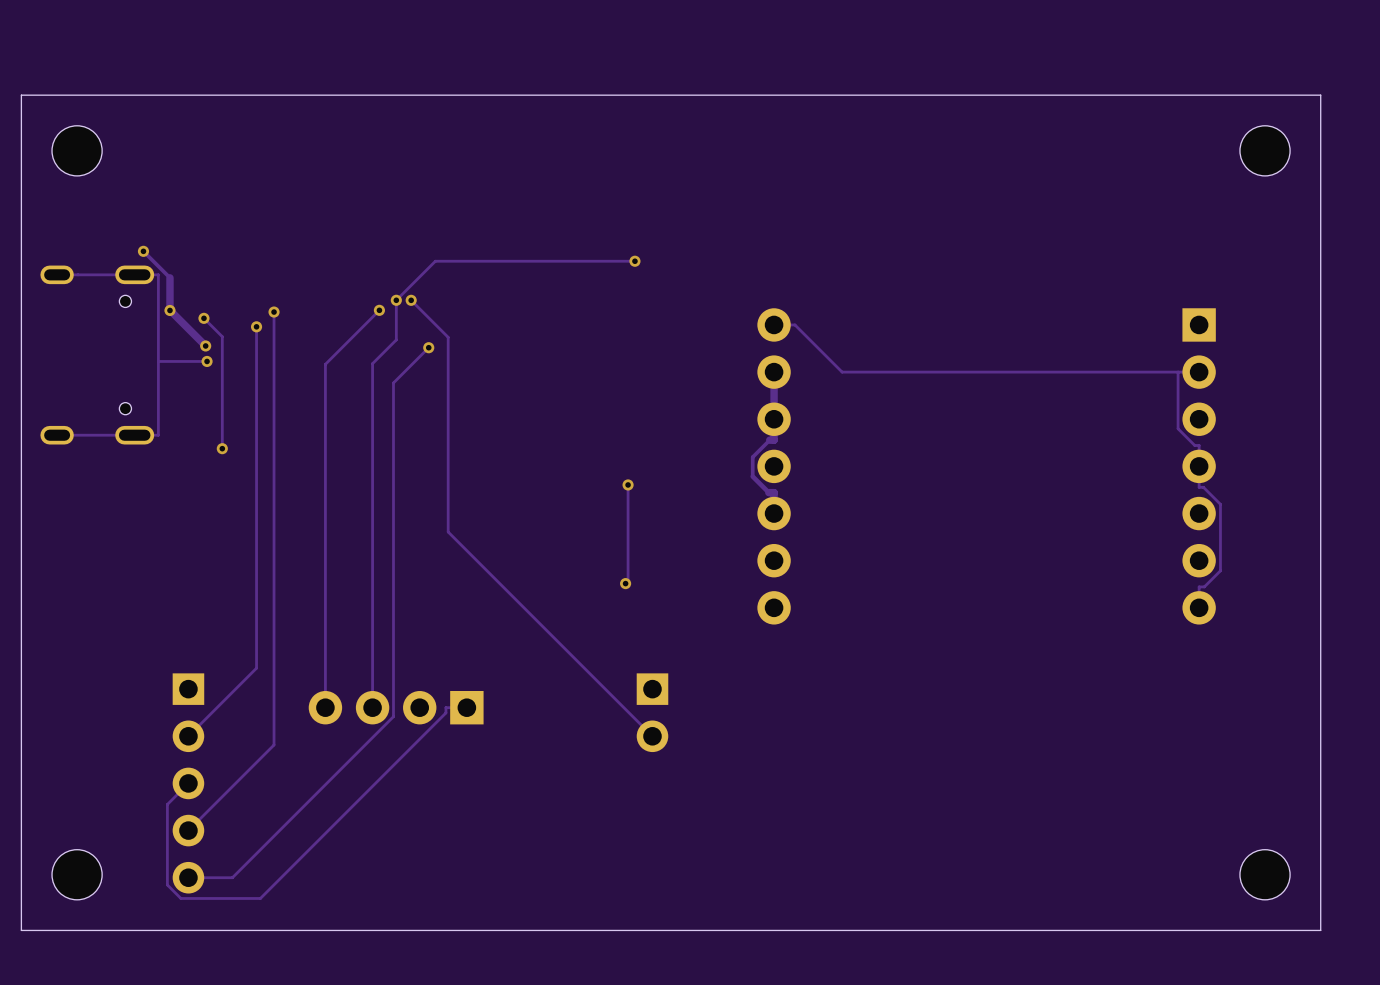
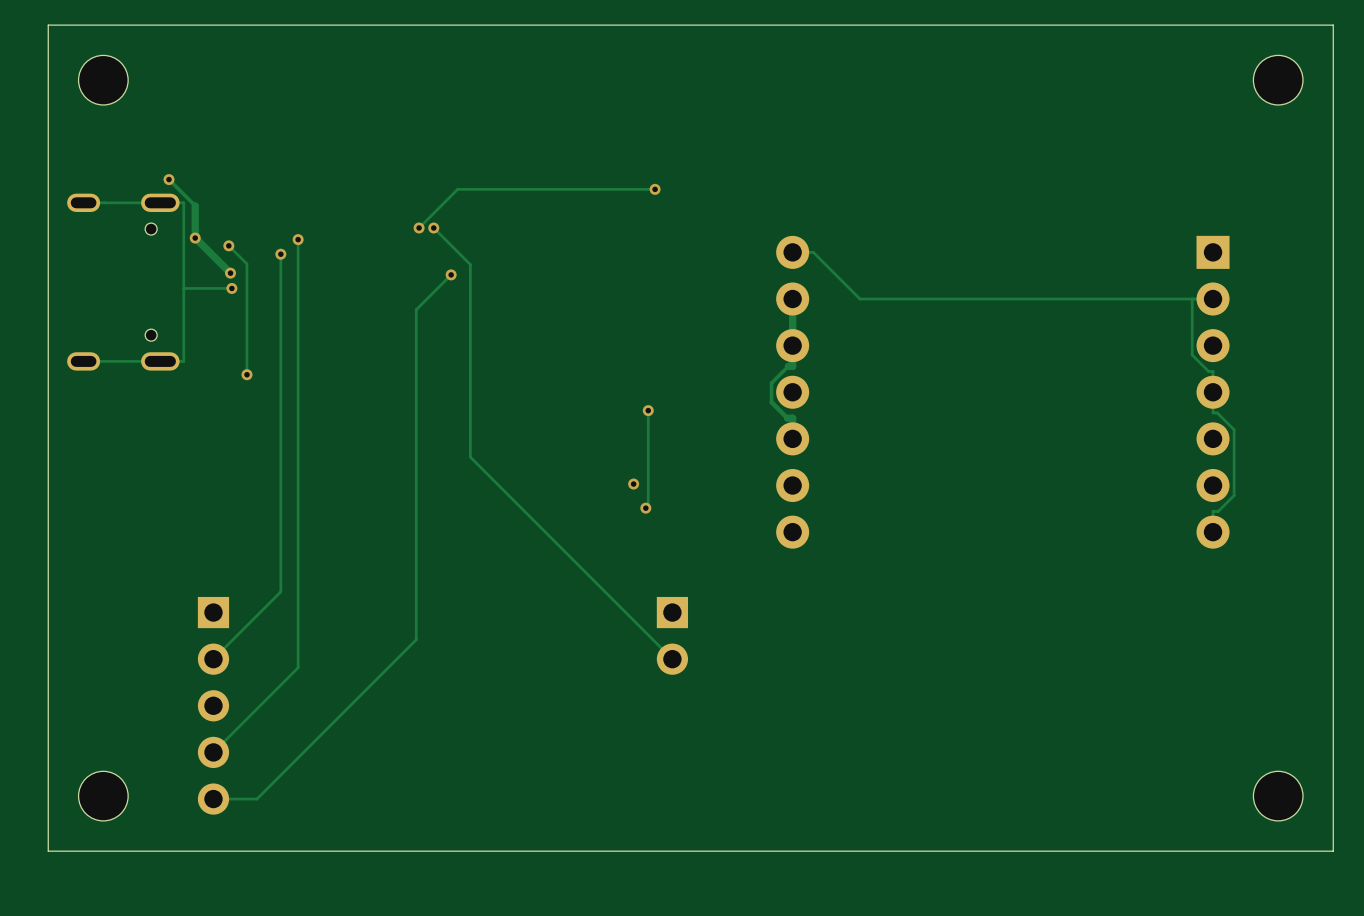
track: (396, 300) (396, 339) (372, 363) (372, 707) -> none
track: (379, 310) (325, 364) (325, 707) -> none
via: (379, 310) -> none
via: none -> (633, 484)
part: (396, 707) -> none
track: (466, 707) (445, 707) (445, 712) (260, 898) (180, 898) (167, 884) (167, 804) (188, 783) -> none

